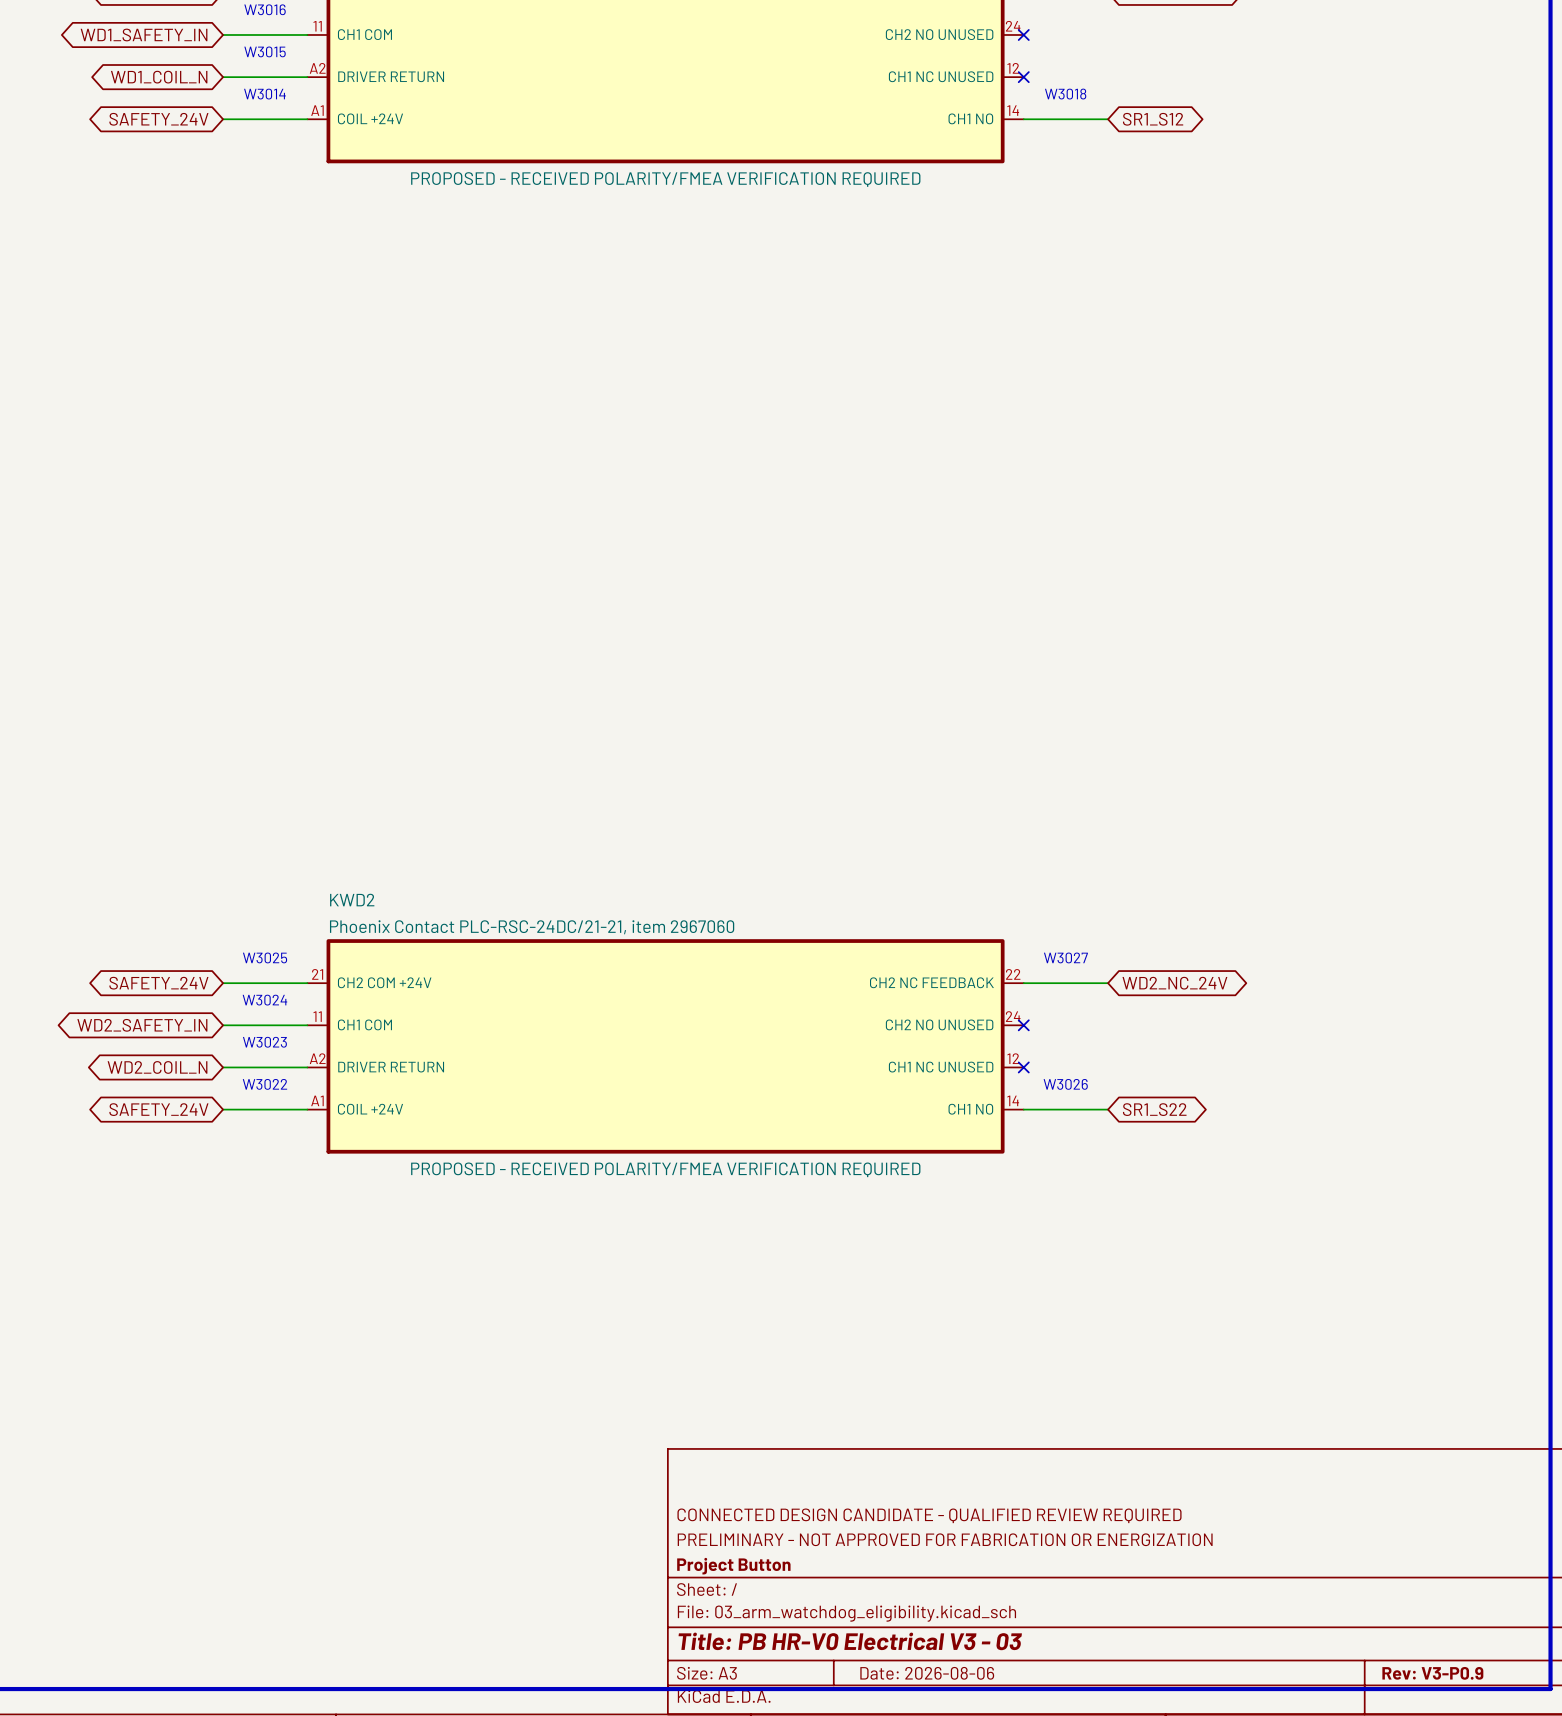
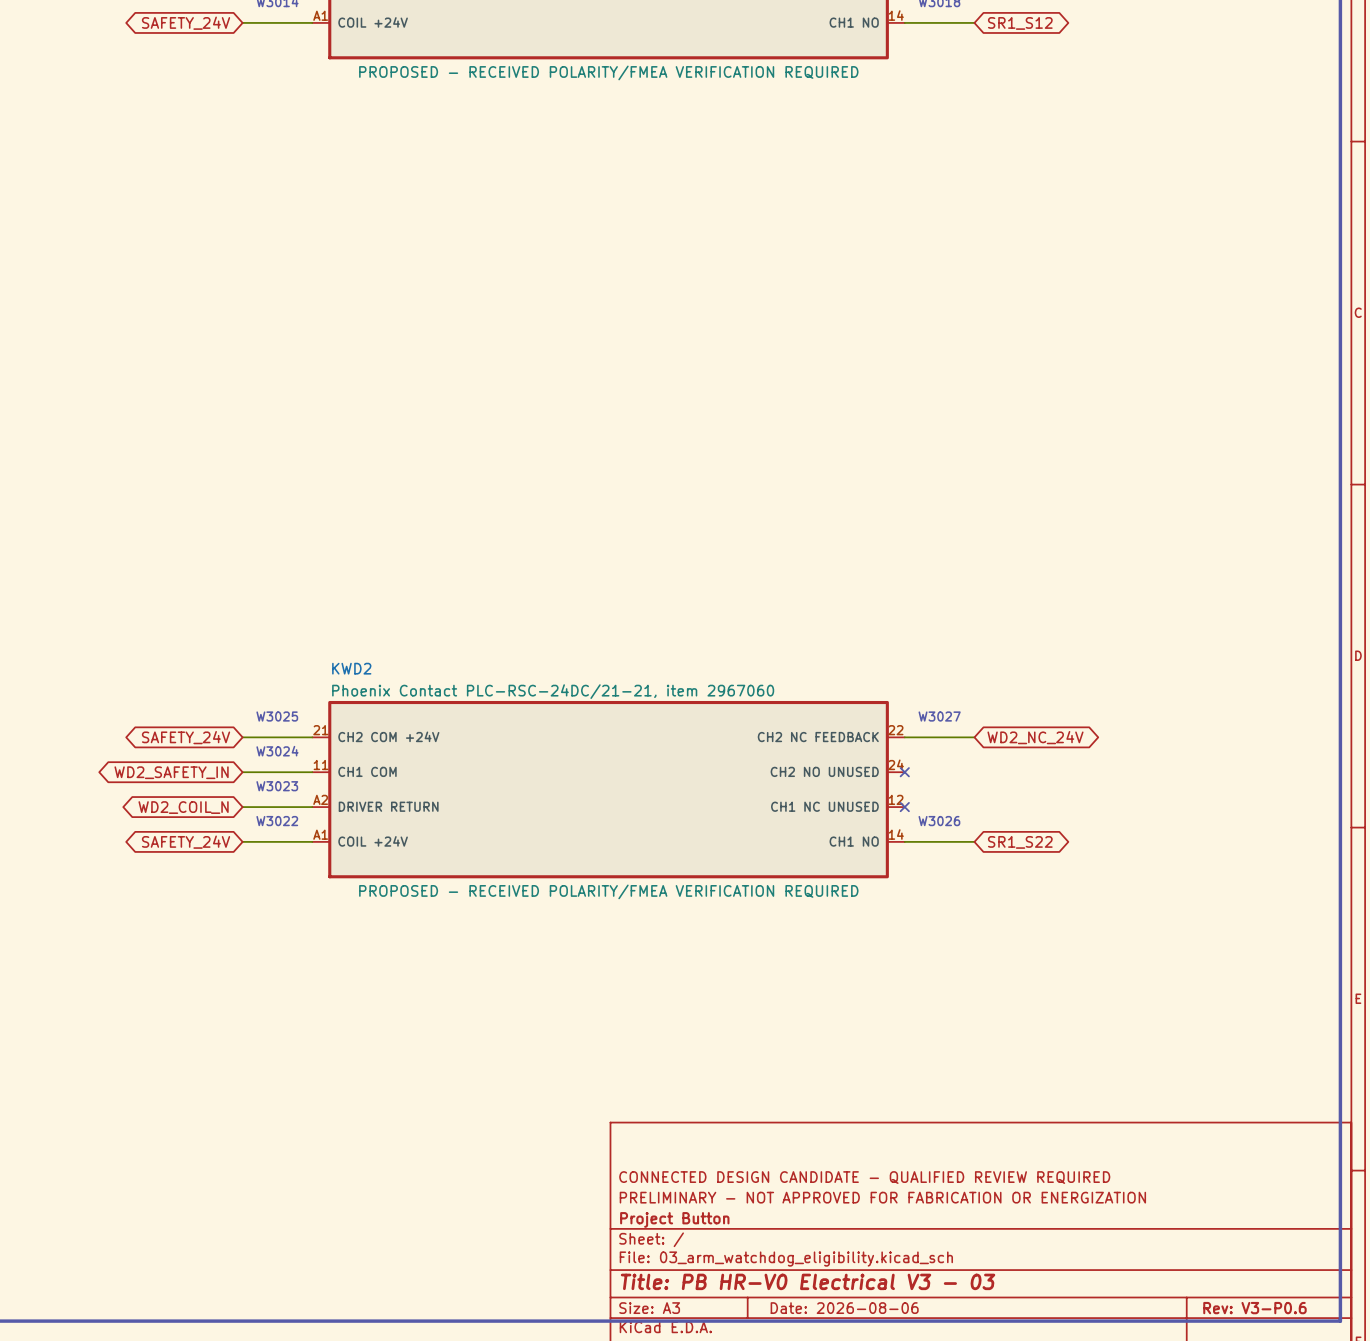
title block: Rev: V3-P0.9 (1432, 1673) -> Rev: V3-P0.6 (1254, 1308)

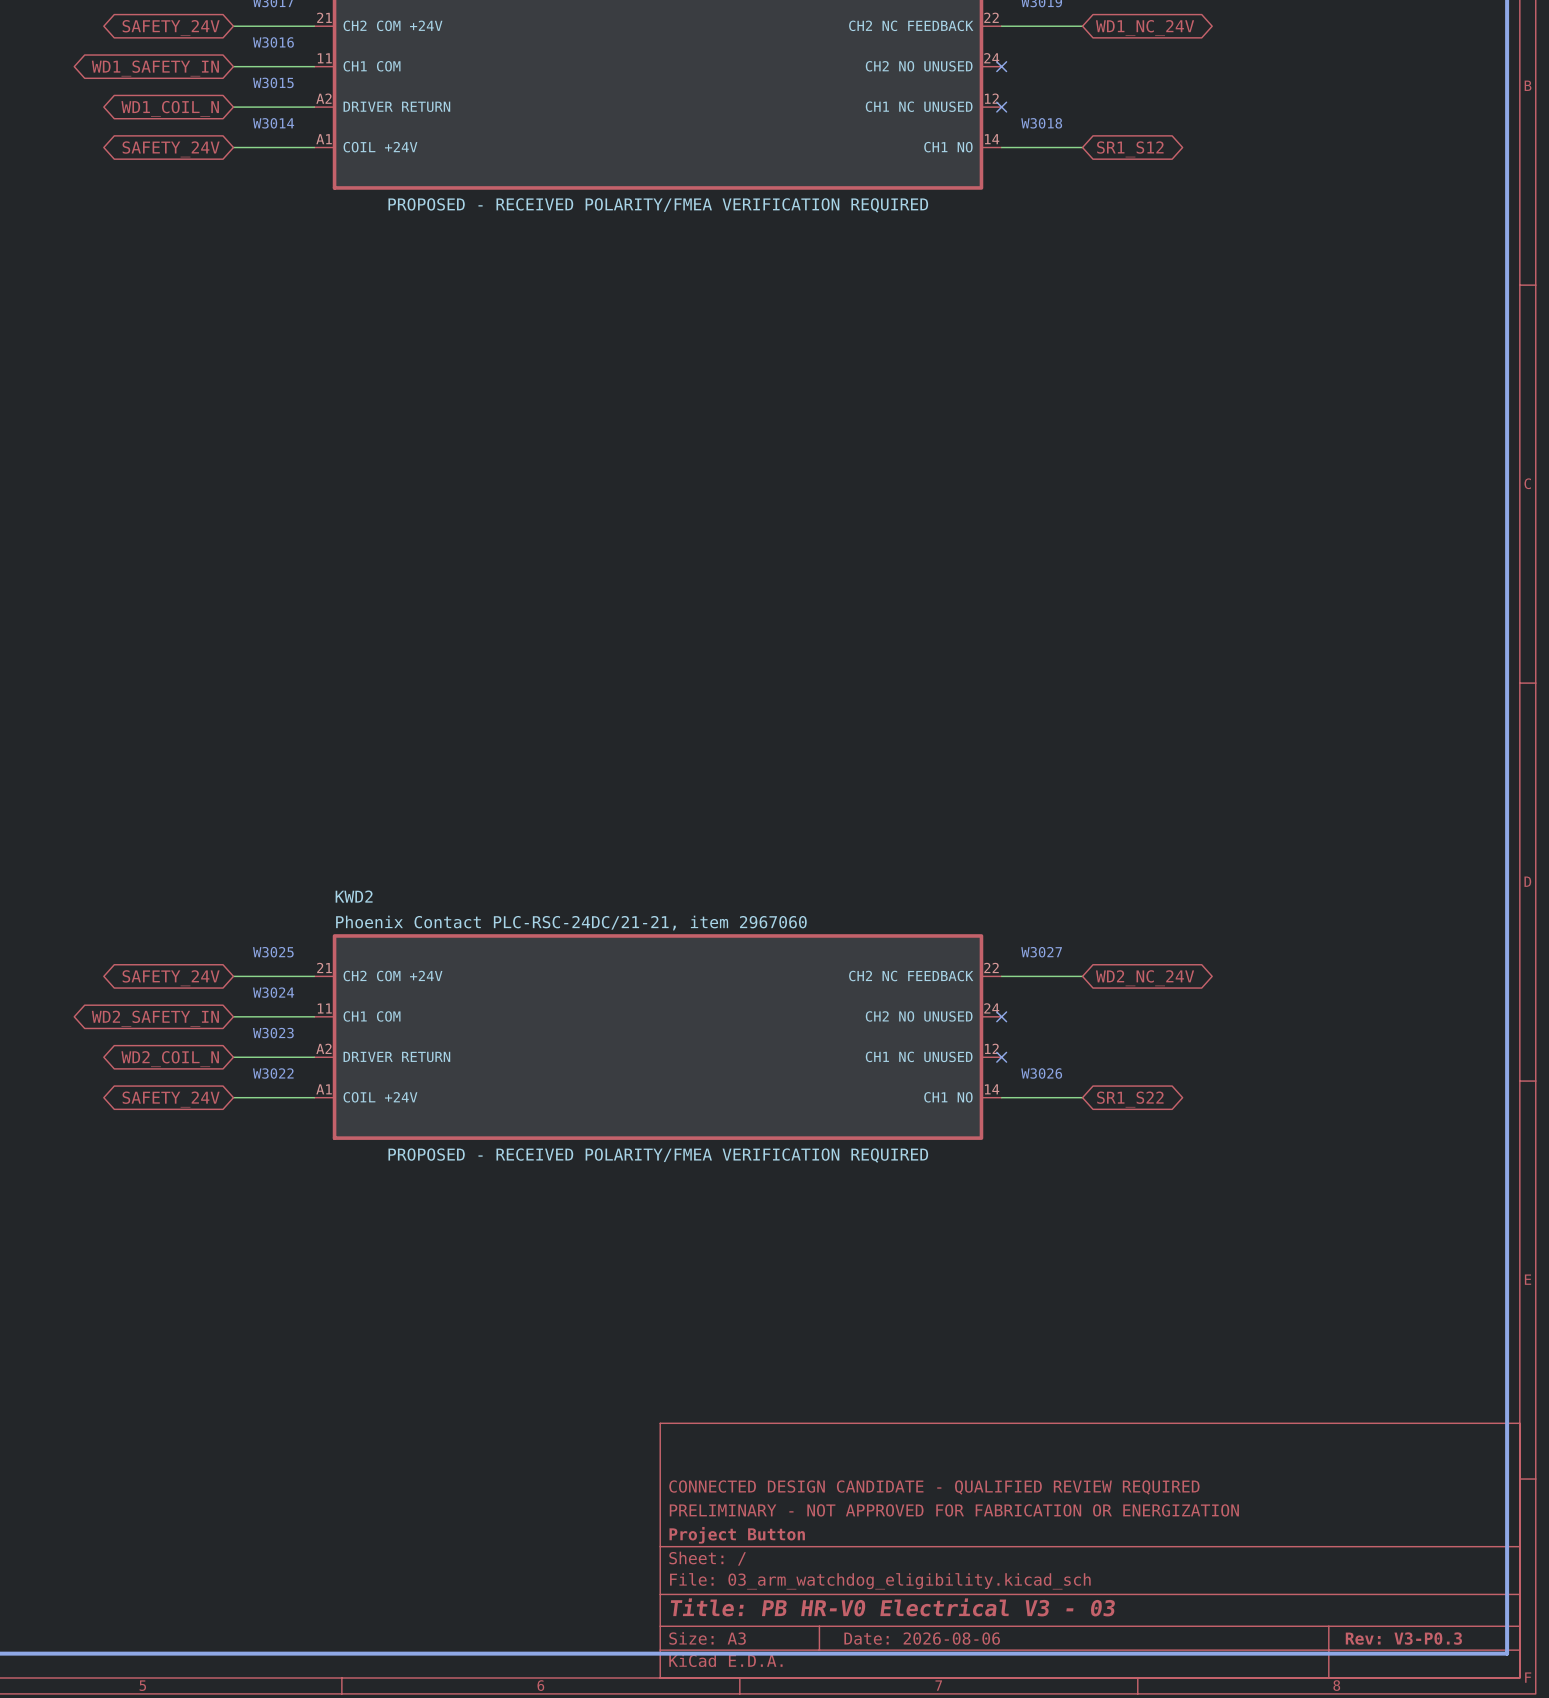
title block: Rev: V3-P0.6 (1254, 1308) -> Rev: V3-P0.3 (1403, 1638)

